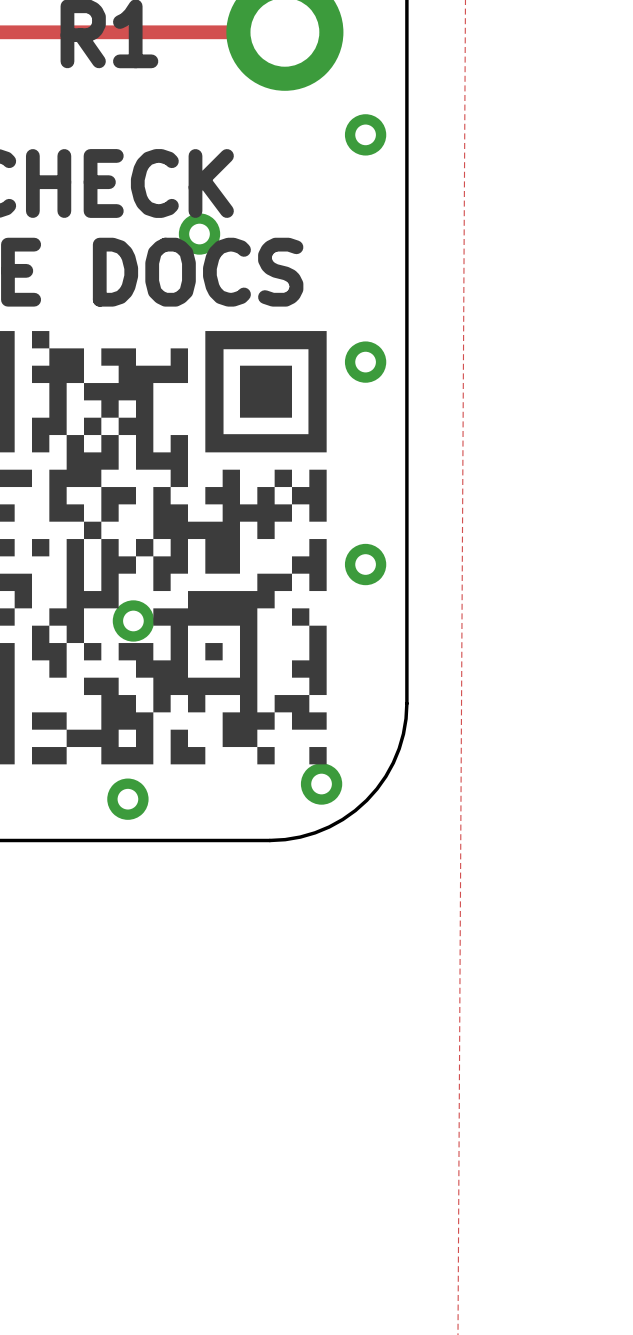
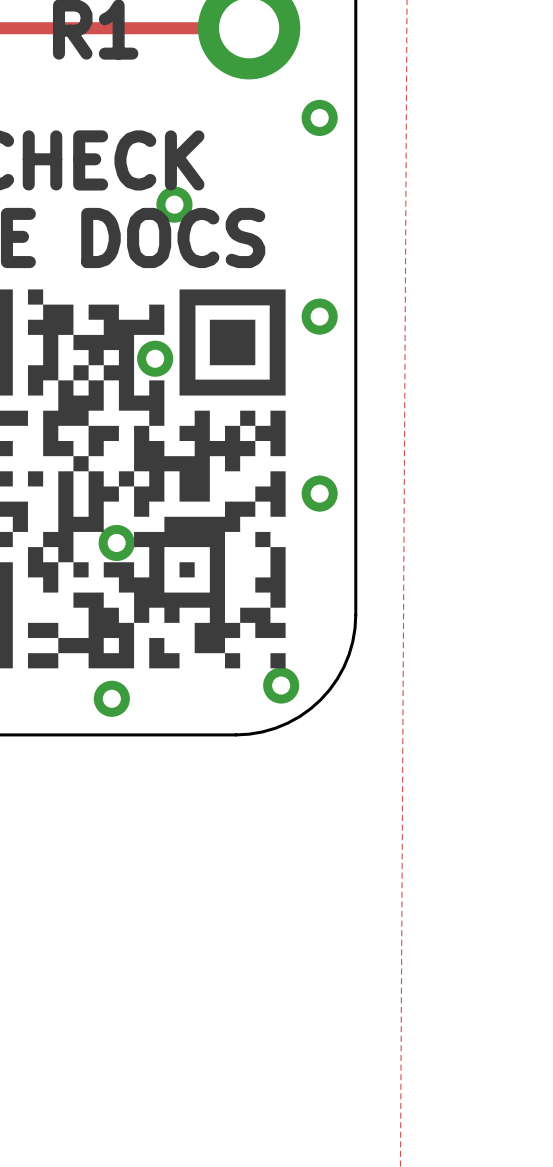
via: none -> (155, 358)

